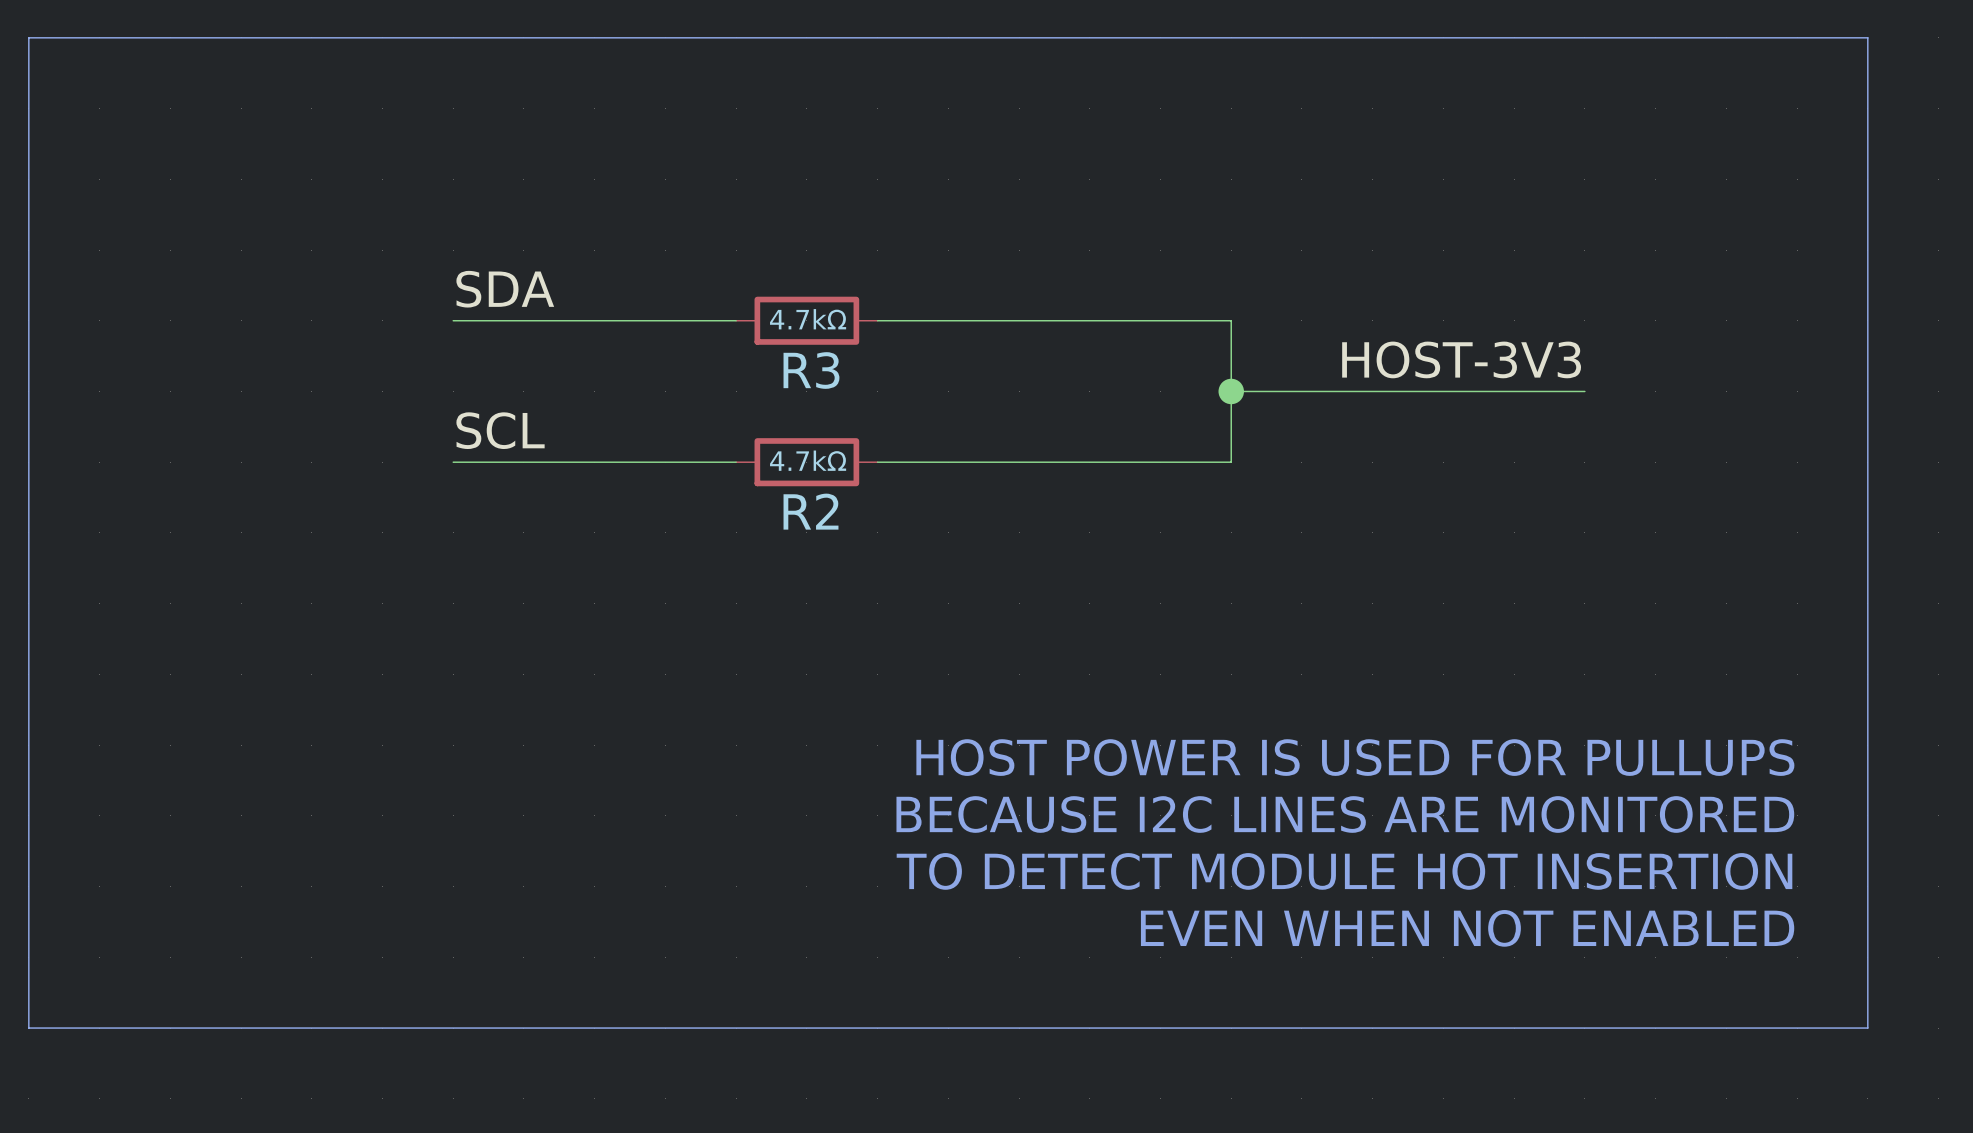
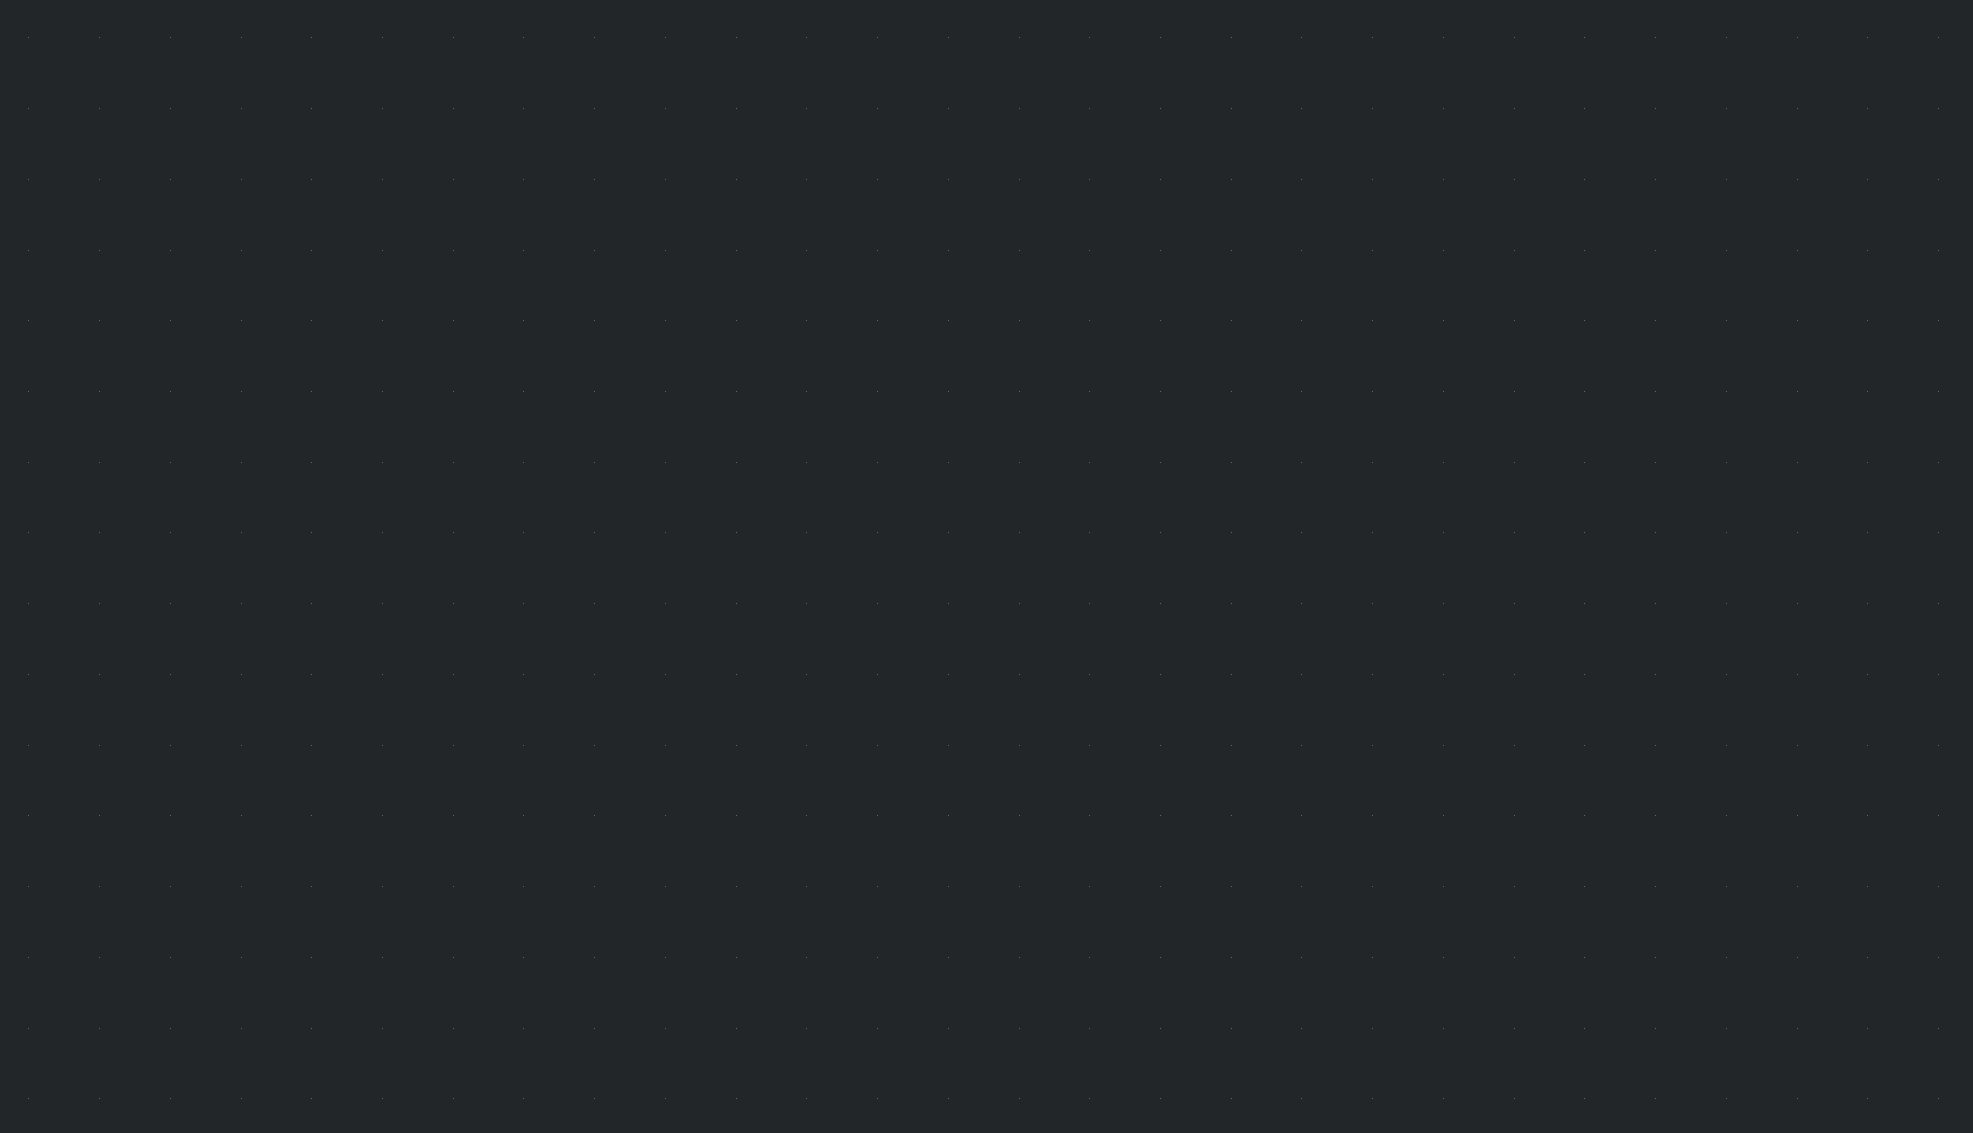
line: (28, 37) (1867, 37) (1867, 1028) (28, 1028) (28, 37) -> none
label: SDA (505, 289) -> none
wire: (453, 320) (736, 320) -> none
R3: 4.7kΩ (806, 320) -> none
wire: (877, 320) (1231, 320) (1231, 462) (877, 462) -> none
label: HOST-3V3 (1461, 359) -> none
wire: (1231, 391) (1584, 391) -> none
junction: (1231, 391) -> none
label: SCL (500, 430) -> none
wire: (453, 462) (736, 462) -> none
R2: 4.7kΩ (806, 462) -> none
text: HOST POWER IS USED FOR PULLUPS (1355, 757) -> none
text: BECAUSE I2C LINES ARE MONITORED (1345, 814) -> none
text: TO DETECT MODULE HOT INSERTION (1344, 871) -> none
text: EVEN WHEN NOT ENABLED (1467, 928) -> none

